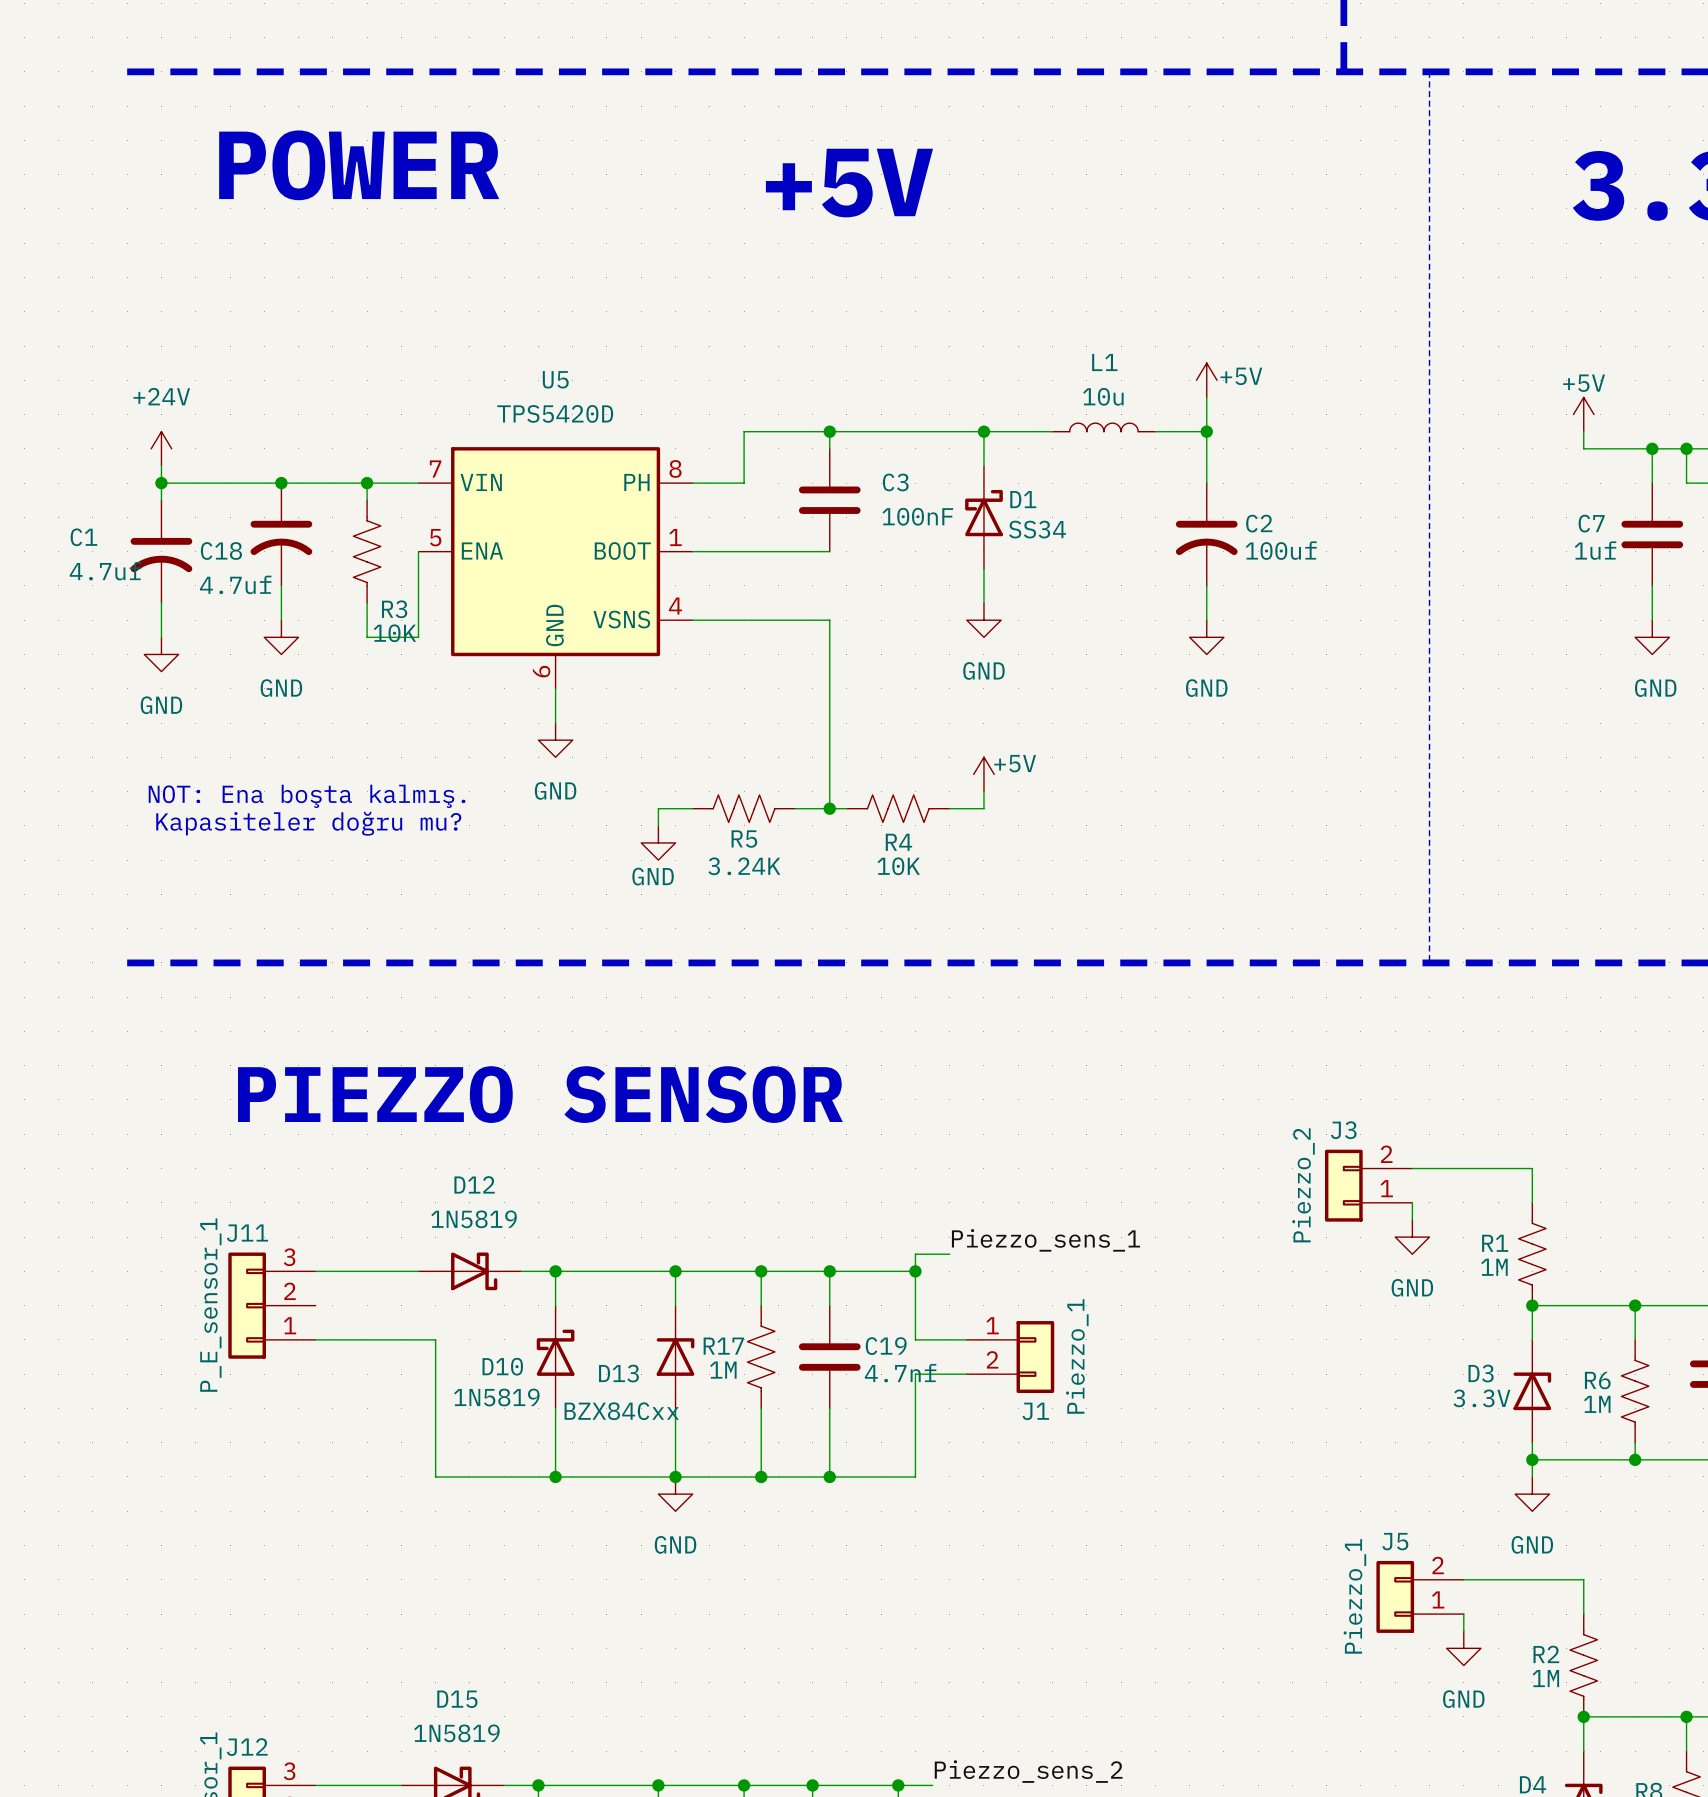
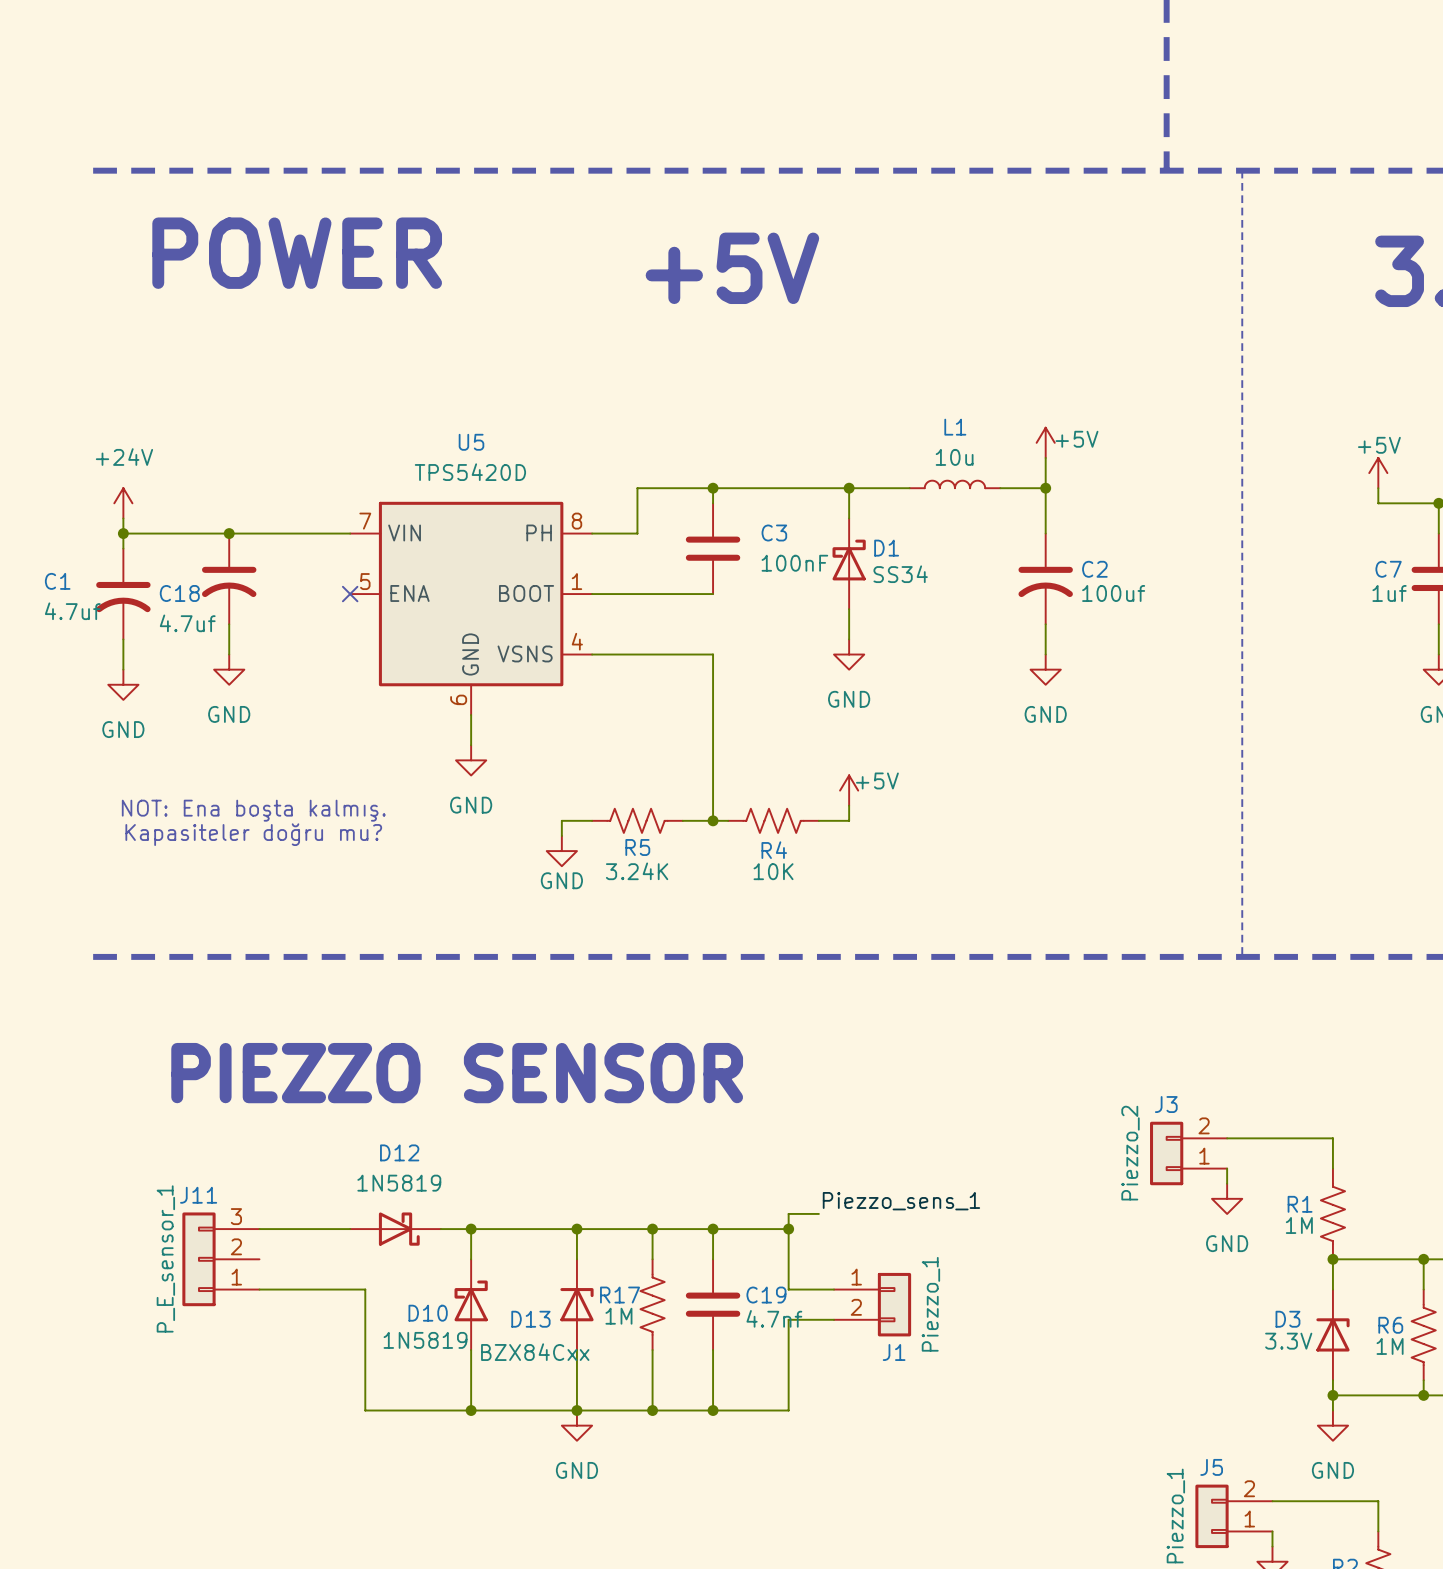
wire: (367, 483) (367, 500) -> none
junction: (367, 483) -> none
R3: 10K (367, 551) -> none
wire: (418, 551) (418, 637) (367, 637) (367, 603) -> none
no-connect mark: none -> (350, 594)

